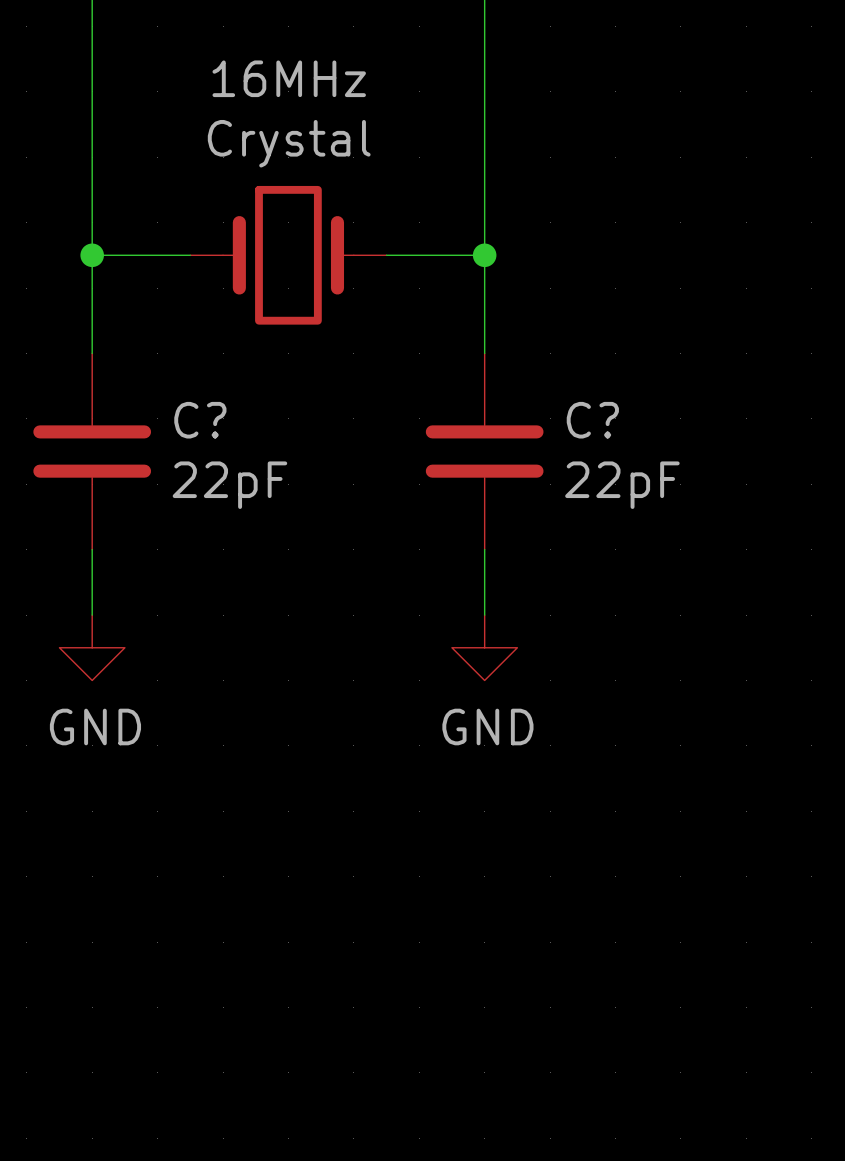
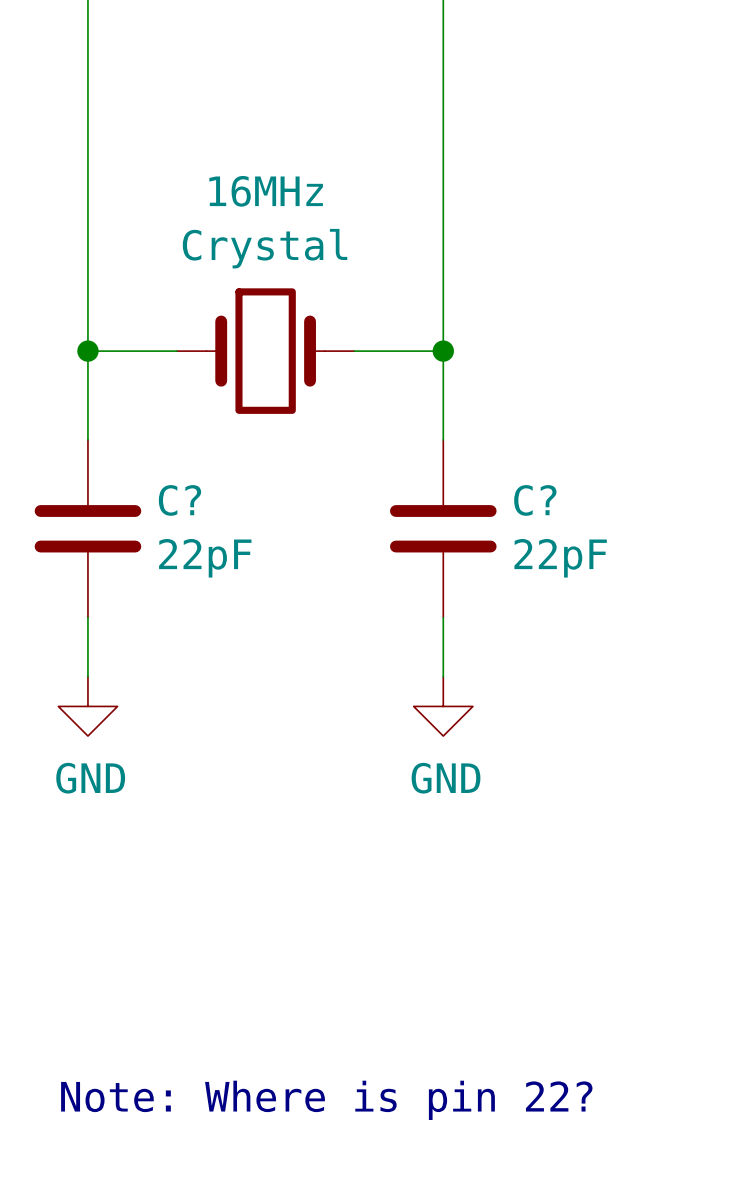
text: none -> Note: Where is pin 22? (326, 1100)

